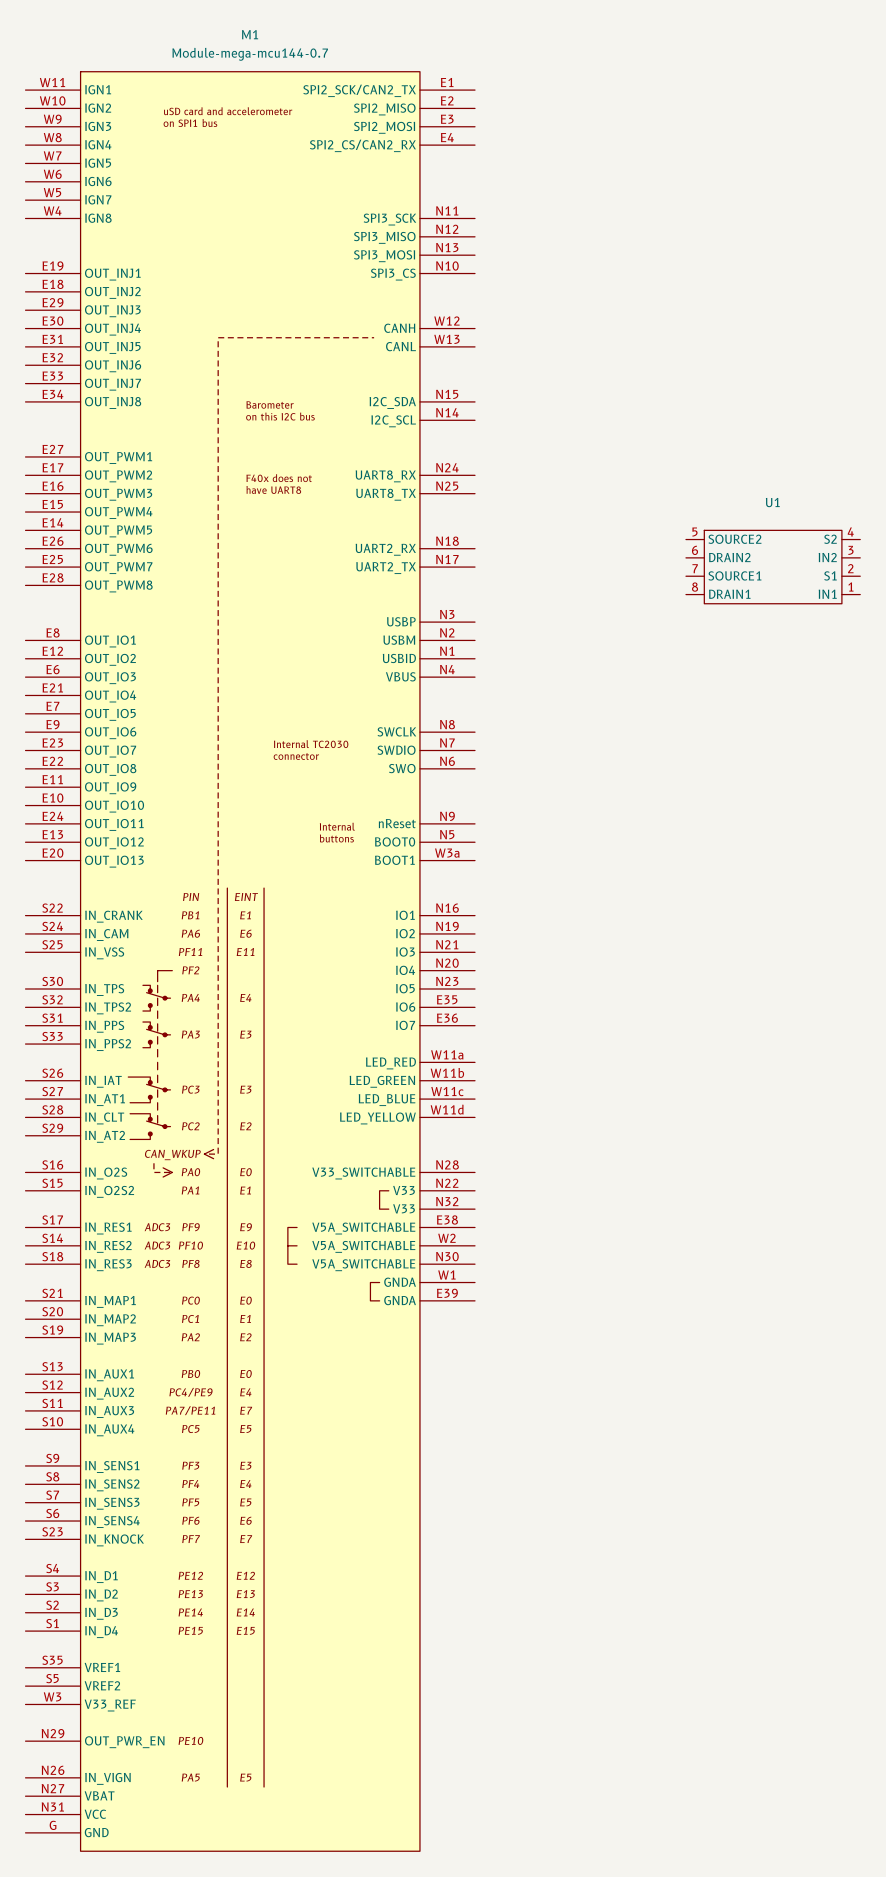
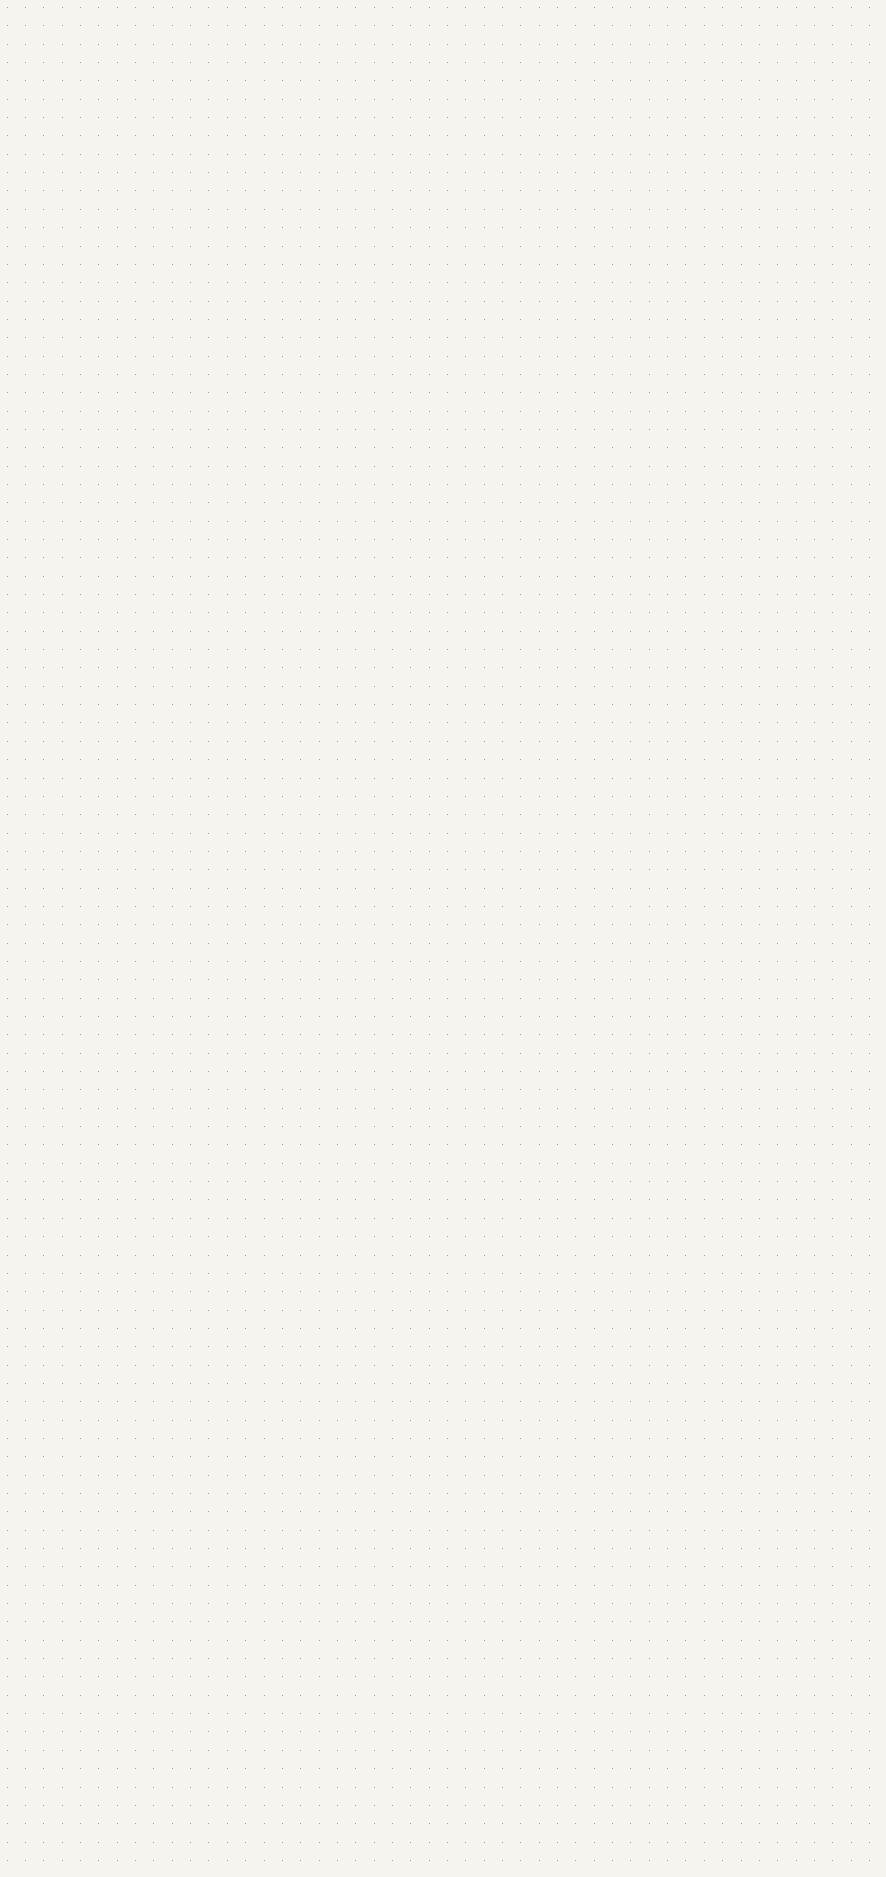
U1: (773, 567) -> none
M1: Module-mega-mcu144-0.7 (250, 961) -> none

